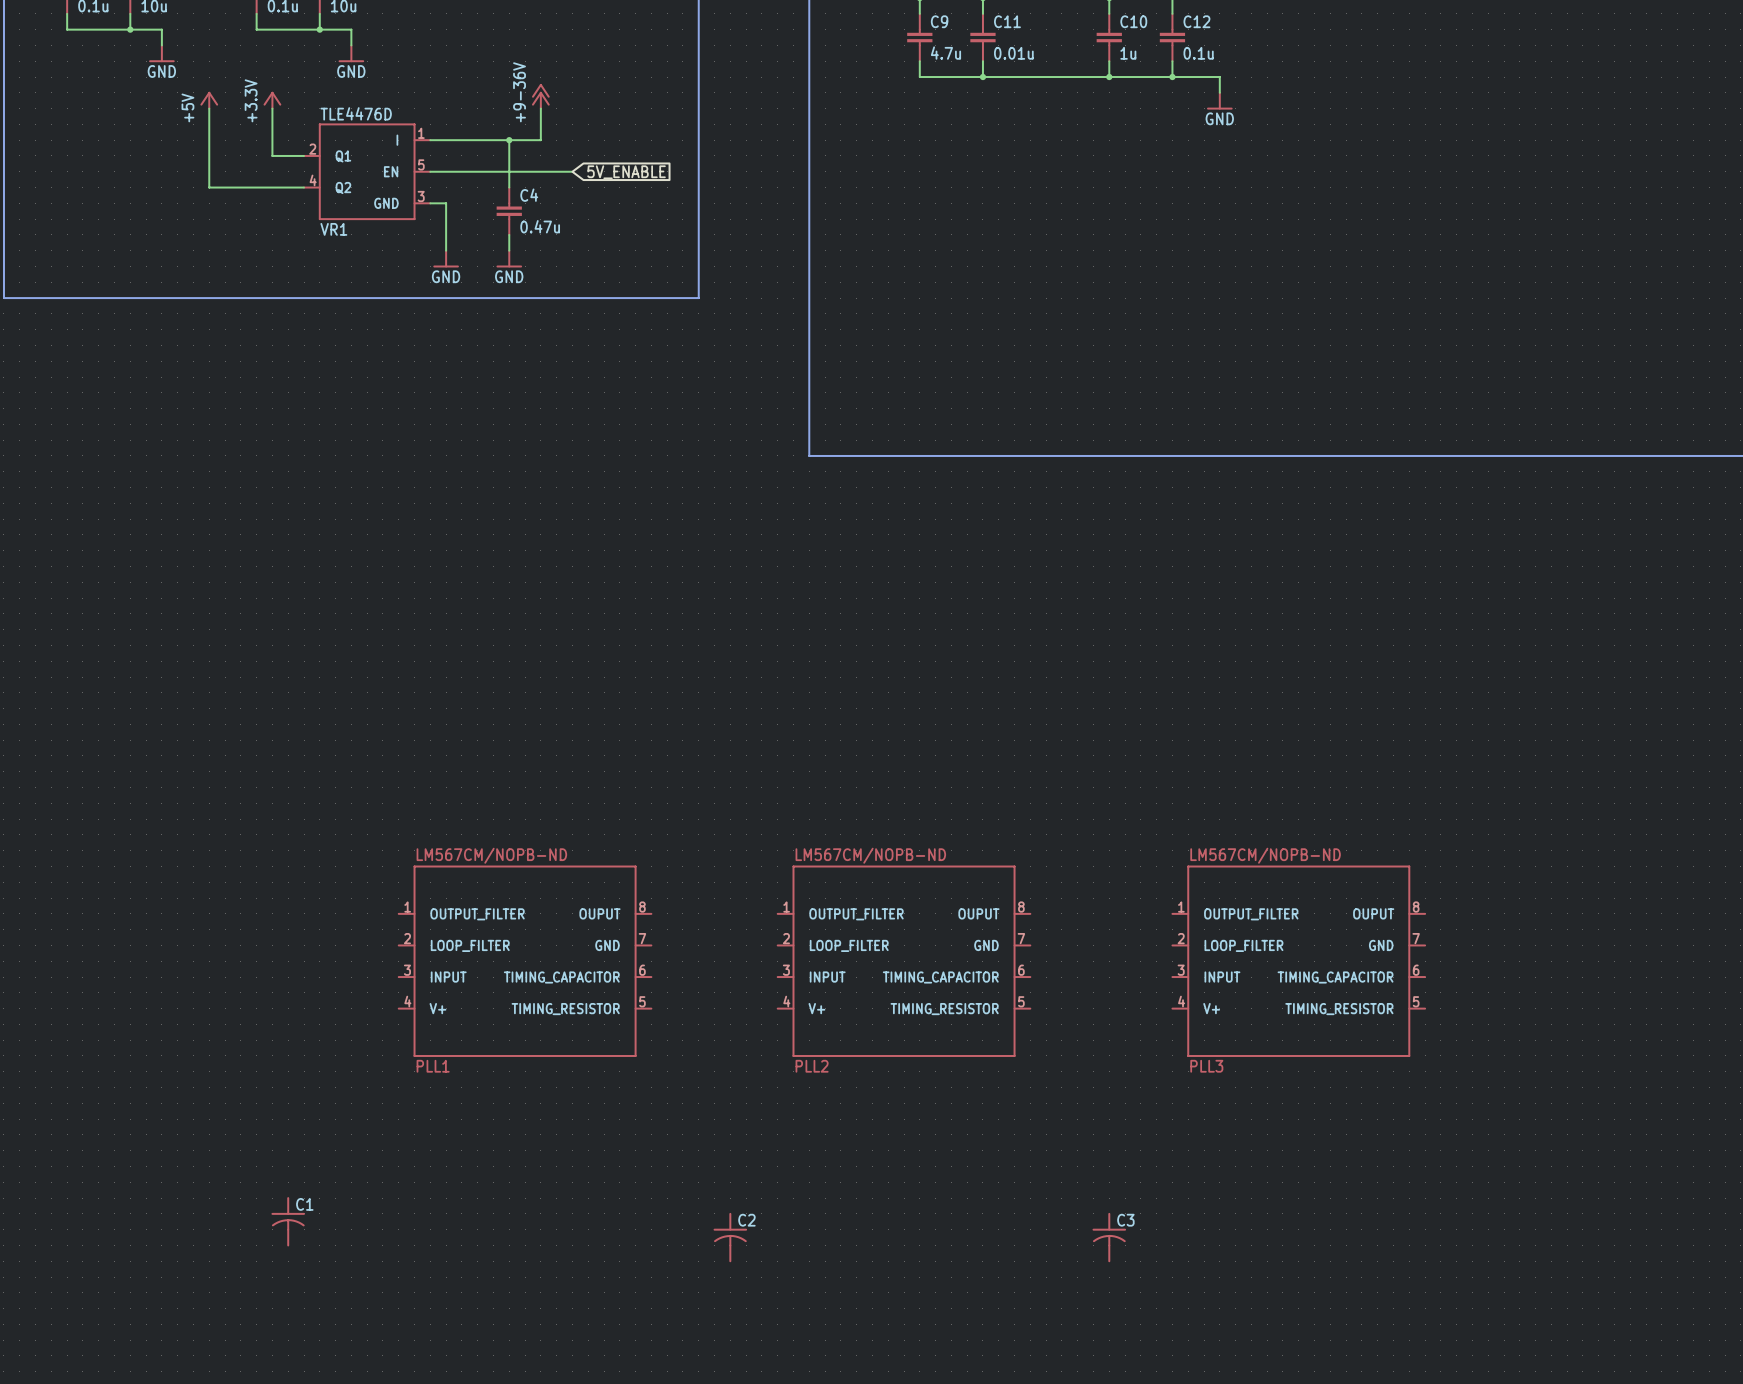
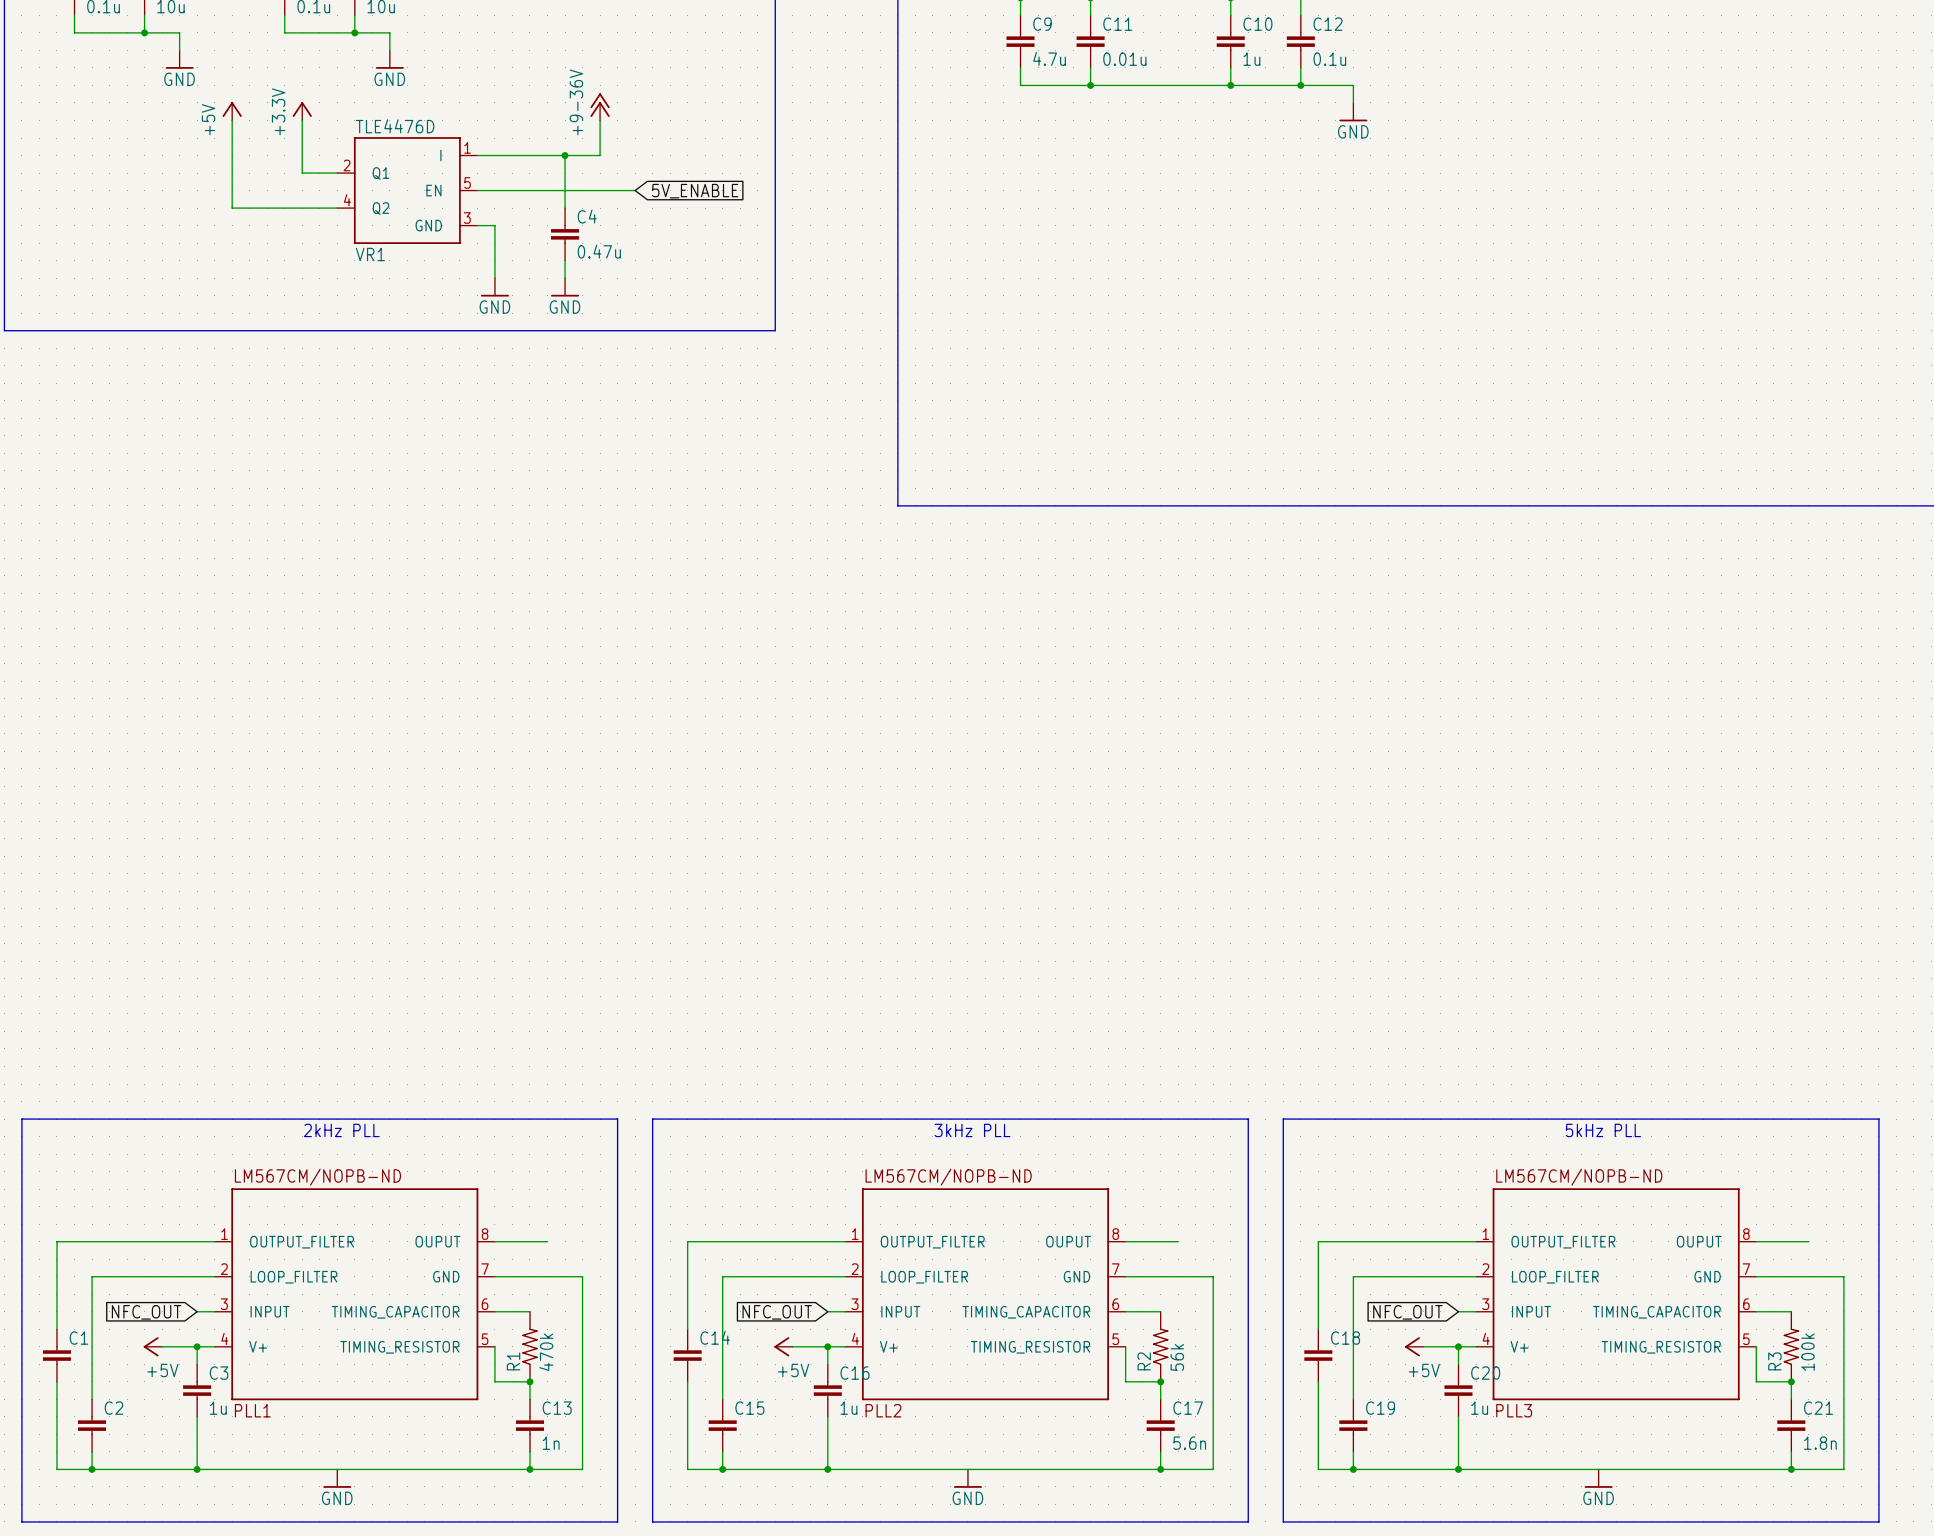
PLL1 position: (525, 961) -> (354, 1294)
PLL2 position: (904, 961) -> (985, 1294)
PLL3 position: (1298, 961) -> (1616, 1294)
line: none -> (21, 1119) (617, 1119) (617, 1521) (21, 1521) (21, 1119)
line: none -> (652, 1119) (1248, 1119) (1248, 1521) (652, 1521) (652, 1119)
line: none -> (1283, 1119) (1878, 1119) (1878, 1521) (1283, 1521) (1283, 1119)
text: none -> 2kHz PLL (341, 1130)
text: none -> 3kHz PLL (972, 1130)
text: none -> 5kHz PLL (1603, 1130)
wire: none -> (214, 1241) (56, 1241) (56, 1329)
wire: none -> (494, 1241) (547, 1241)
wire: none -> (845, 1241) (687, 1241) (687, 1329)
wire: none -> (1125, 1241) (1178, 1241)
wire: none -> (1476, 1241) (1318, 1241) (1318, 1329)
wire: none -> (1756, 1241) (1808, 1241)
wire: none -> (214, 1276) (92, 1276) (92, 1399)
wire: none -> (494, 1276) (582, 1276) (582, 1469) (56, 1469) (56, 1381)
wire: none -> (845, 1276) (722, 1276) (722, 1399)
wire: none -> (1125, 1276) (1213, 1276) (1213, 1469) (687, 1469) (687, 1381)
wire: none -> (1476, 1276) (1353, 1276) (1353, 1399)
wire: none -> (1756, 1276) (1843, 1276) (1843, 1469) (1318, 1469) (1318, 1381)
global label: none -> NFC_OUT (146, 1312)
wire: none -> (197, 1311) (214, 1311)
wire: none -> (494, 1311) (529, 1311)
global label: none -> NFC_OUT (777, 1312)
wire: none -> (827, 1311) (845, 1311)
wire: none -> (1125, 1311) (1160, 1311)
global label: none -> NFC_OUT (1407, 1312)
wire: none -> (1458, 1311) (1476, 1311)
wire: none -> (1756, 1311) (1791, 1311)
C1 symbol: [271, 1198, 305, 1246] -> [42, 1329, 72, 1382]
power symbol: none -> +5V (152, 1346)
wire: none -> (162, 1346) (214, 1346)
wire: none -> (197, 1346) (197, 1364)
junction: none -> (197, 1346)
wire: none -> (494, 1346) (494, 1381) (529, 1381) (529, 1399)
R1: none -> 470k (529, 1346)
power symbol: none -> +5V (783, 1346)
C2 symbol: [713, 1213, 747, 1262] -> [78, 1399, 107, 1452]
wire: none -> (792, 1346) (845, 1346)
wire: none -> (827, 1346) (827, 1364)
junction: none -> (827, 1346)
wire: none -> (1125, 1346) (1125, 1381) (1160, 1381) (1160, 1399)
R2: none -> 56k (1160, 1346)
C3 symbol: [1092, 1213, 1126, 1262] -> [183, 1364, 212, 1417]
power symbol: none -> +5V (1414, 1346)
wire: none -> (1423, 1346) (1476, 1346)
wire: none -> (1458, 1346) (1458, 1364)
junction: none -> (1458, 1346)
wire: none -> (1756, 1346) (1756, 1381) (1791, 1381) (1791, 1399)
R3: none -> 100k (1791, 1346)
C14: none -> (687, 1355)
C18: none -> (1318, 1355)
junction: none -> (529, 1381)
junction: none -> (1160, 1381)
junction: none -> (1791, 1381)
C16: none -> 1u (827, 1390)
C20: none -> 1u (1458, 1390)
C3 value: none -> 1u (218, 1408)
wire: none -> (197, 1416) (197, 1469)
wire: none -> (827, 1416) (827, 1469)
wire: none -> (1458, 1416) (1458, 1469)
C13: none -> 1n (529, 1425)
C15: none -> (722, 1425)
C17: none -> 5.6n (1160, 1425)
C19: none -> (1353, 1425)
C21: none -> 1.8n (1791, 1425)
wire: none -> (92, 1451) (92, 1469)
wire: none -> (529, 1451) (529, 1469)
wire: none -> (722, 1451) (722, 1469)
wire: none -> (1160, 1451) (1160, 1469)
wire: none -> (1353, 1451) (1353, 1469)
wire: none -> (1791, 1451) (1791, 1469)
junction: none -> (92, 1469)
junction: none -> (197, 1469)
junction: none -> (529, 1469)
junction: none -> (722, 1469)
junction: none -> (827, 1469)
junction: none -> (1160, 1469)
junction: none -> (1353, 1469)
junction: none -> (1458, 1469)
junction: none -> (1791, 1469)
power symbol: none -> GND (337, 1478)
power symbol: none -> GND (967, 1478)
power symbol: none -> GND (1598, 1478)

